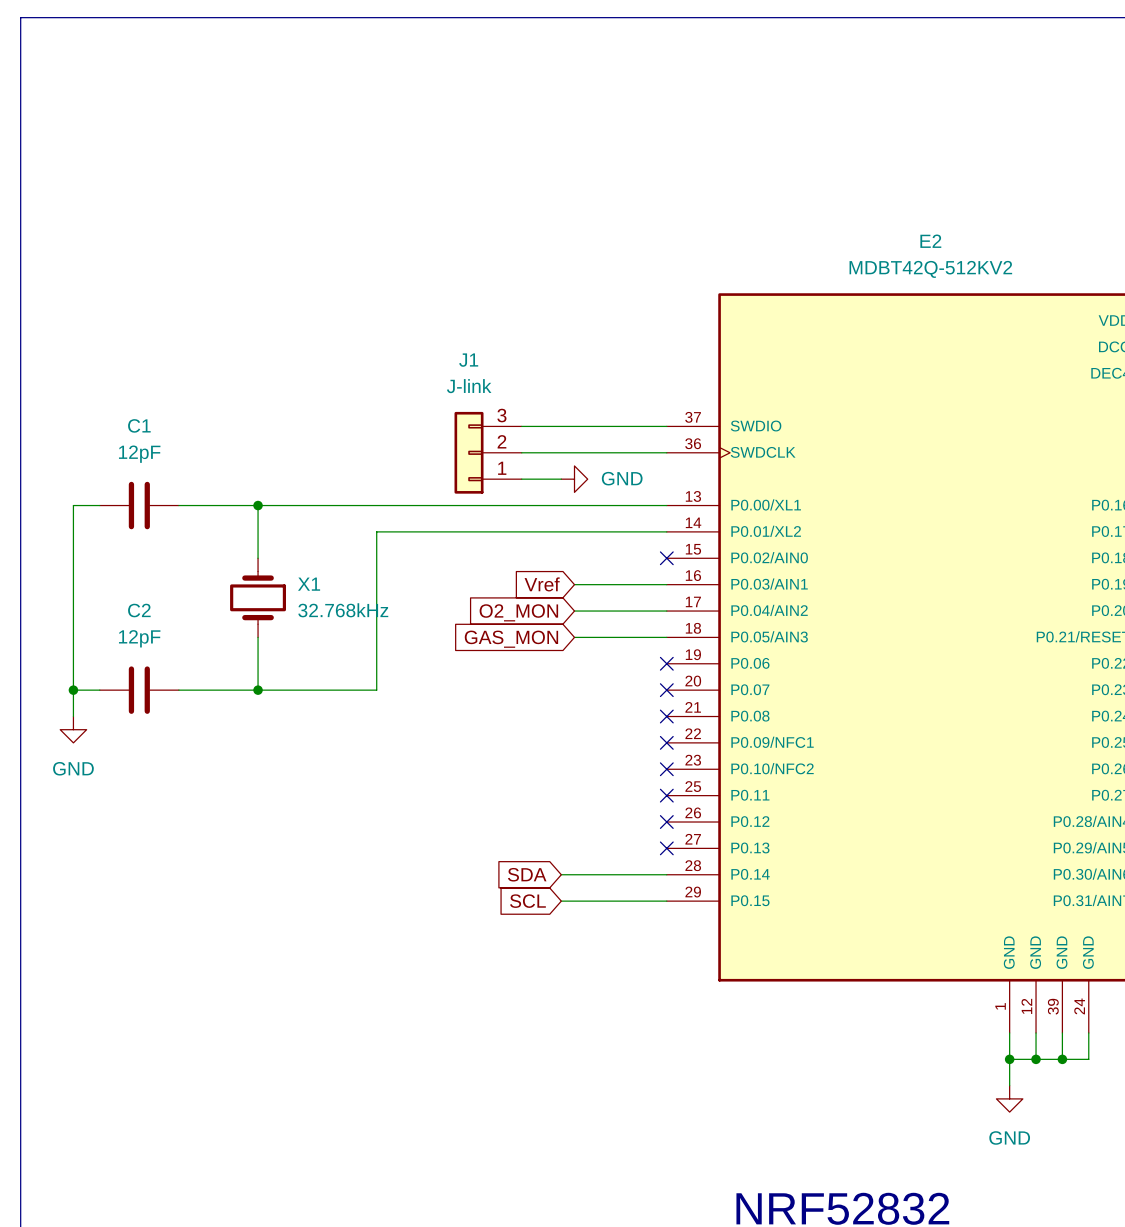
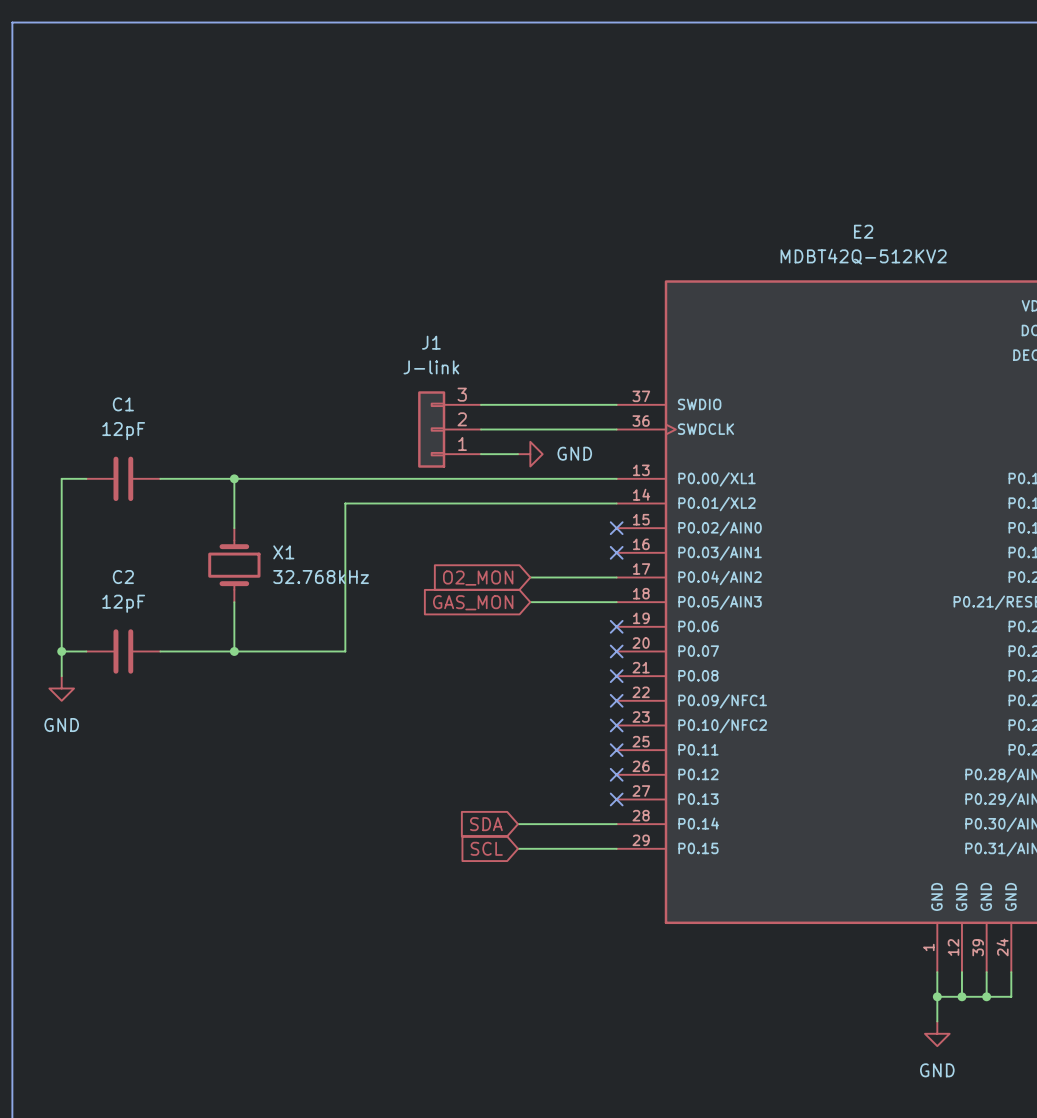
global label: Vref (542, 584) -> none
wire: (574, 584) (666, 584) -> none
no-connect mark: none -> (616, 552)

